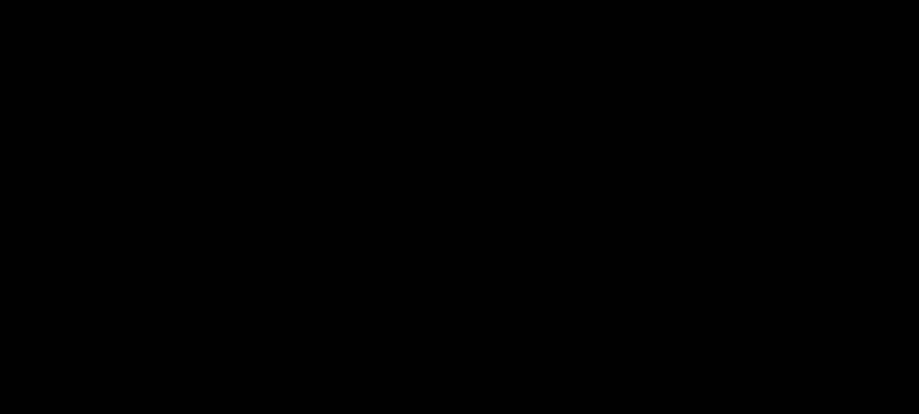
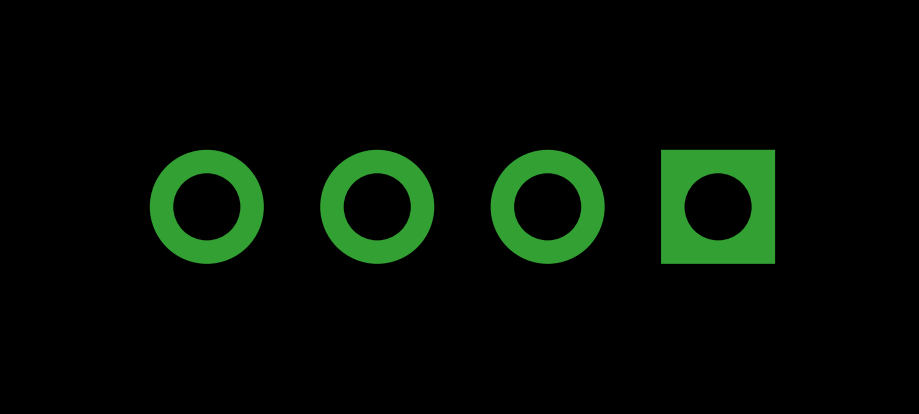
part: none -> (462, 206)

